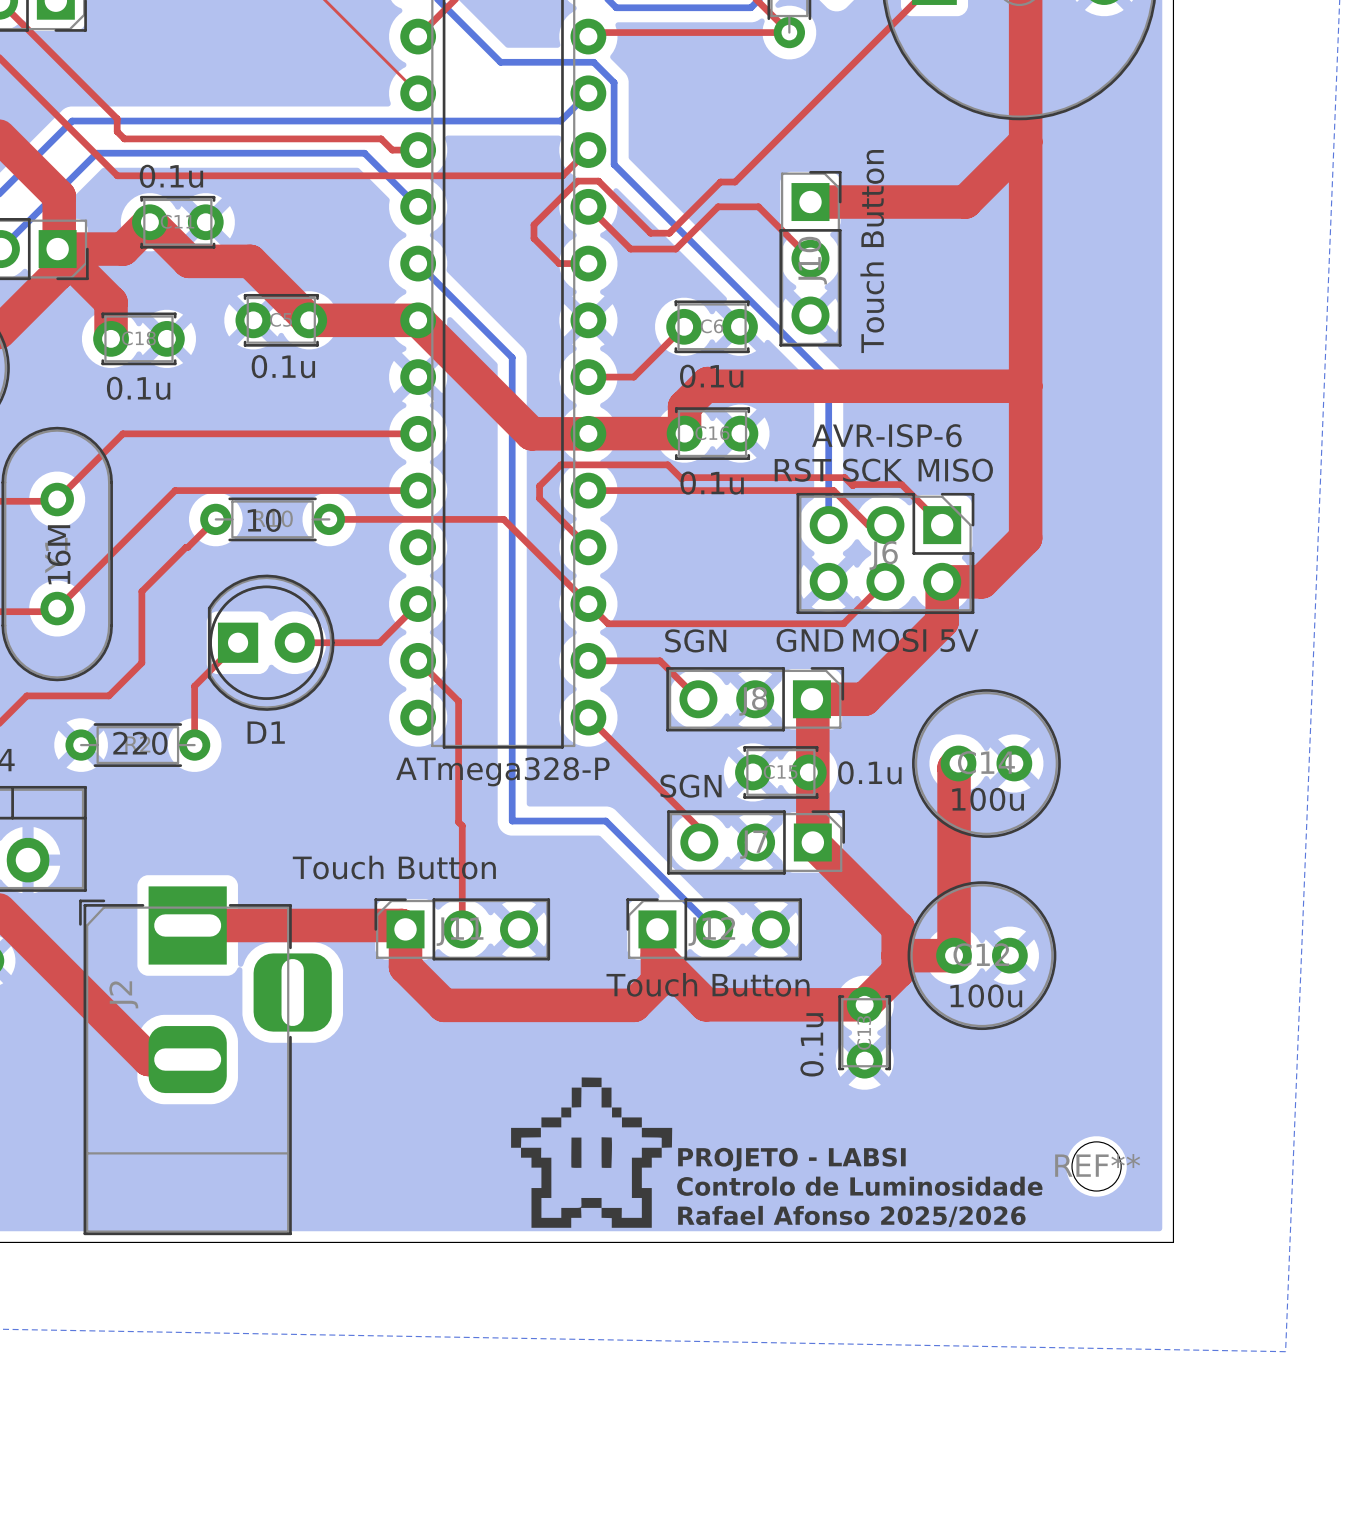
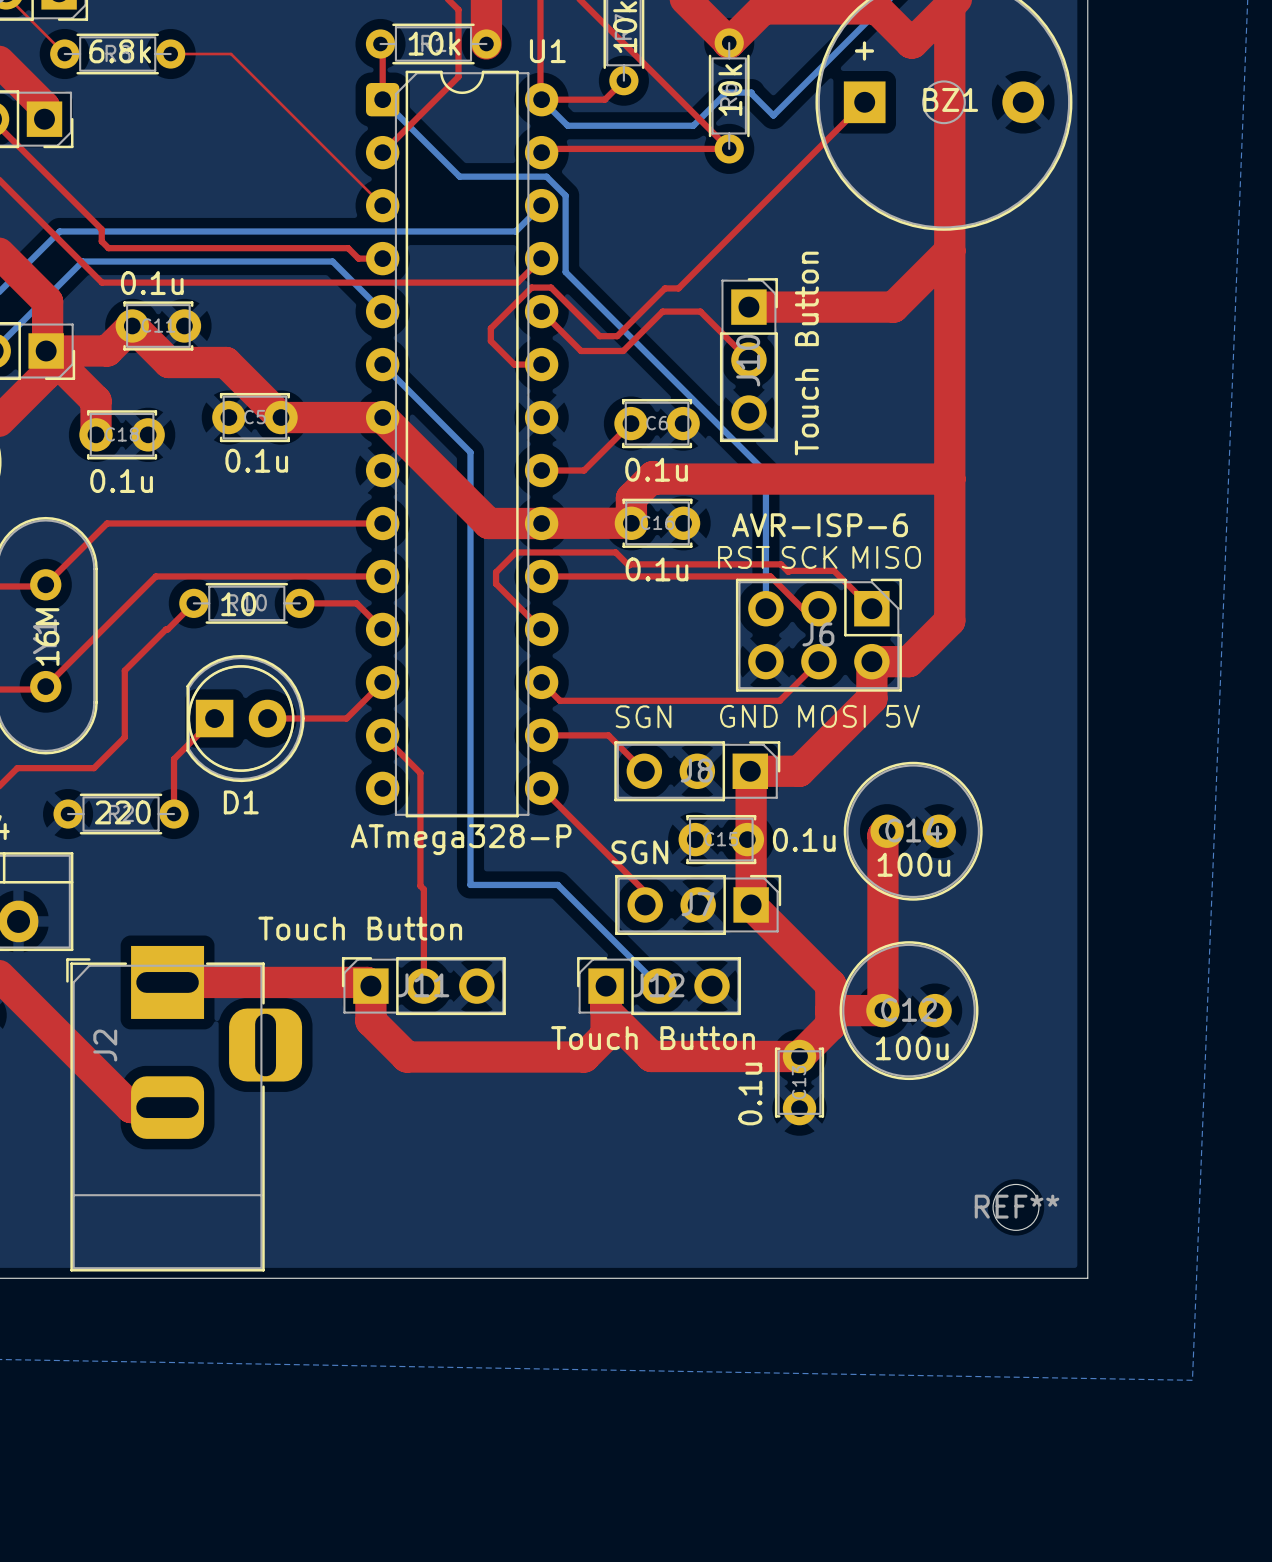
top track: (390, 519) (503, 519) (588, 604) -> (356, 603) (382, 629)
drawing: [511, 1077, 673, 1228] -> none
text: PROJETO - LABSI (791, 1159) -> none
text: Controlo de Luminosidade (859, 1186) -> none
text: Rafael Afonso 2025/2026 (851, 1216) -> none

